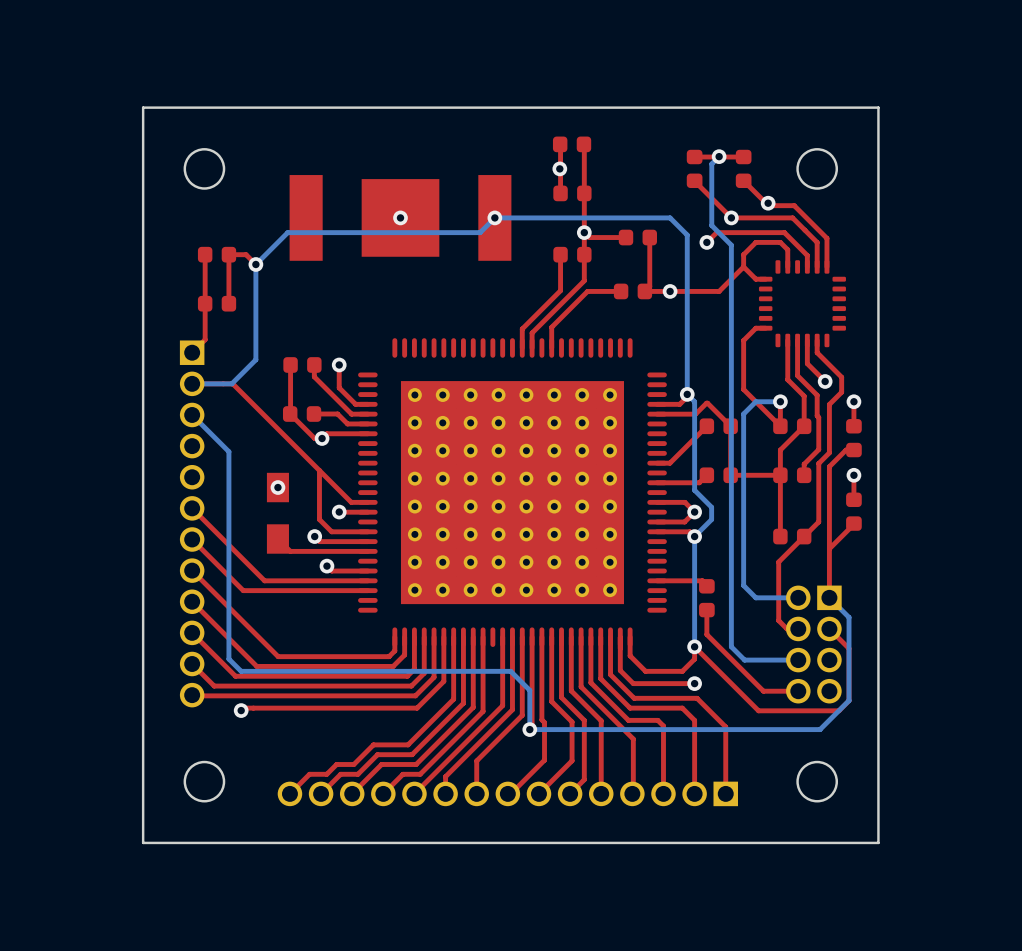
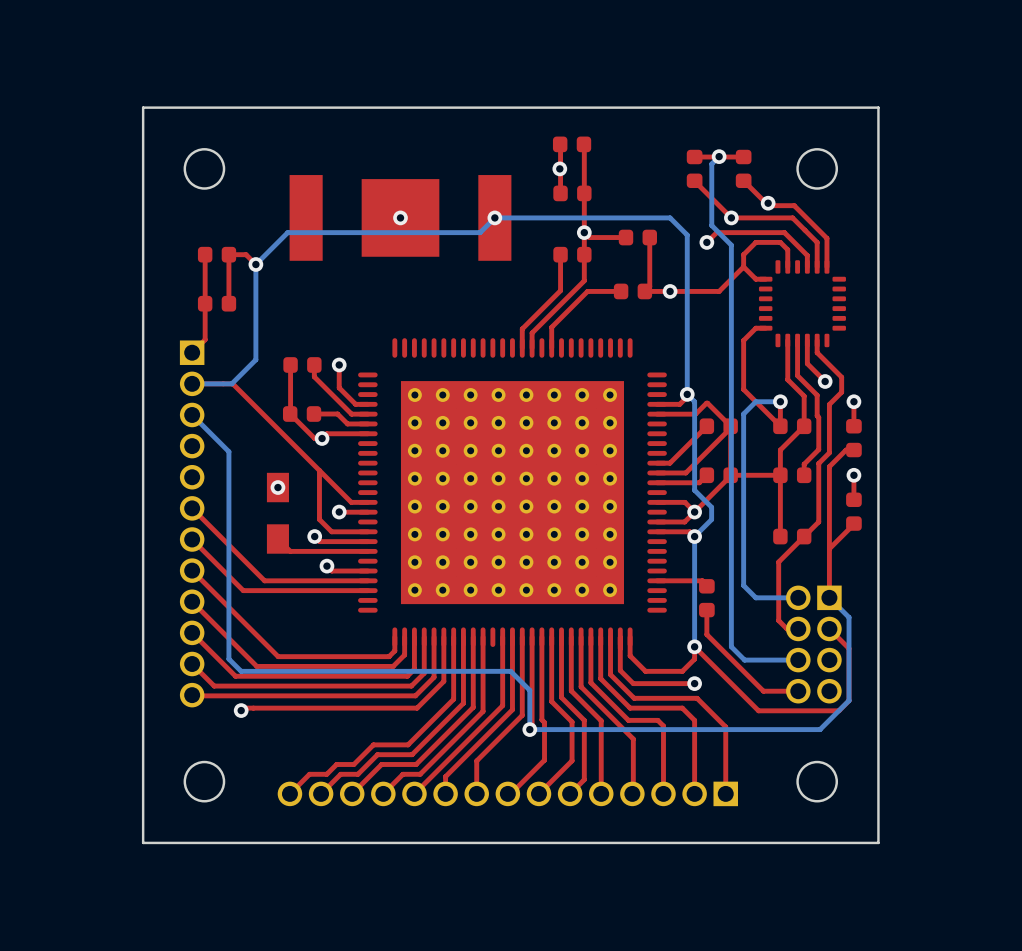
top track: none -> (730, 428) (685, 472) (657, 472)
top track: none -> (730, 475) (694, 512)

